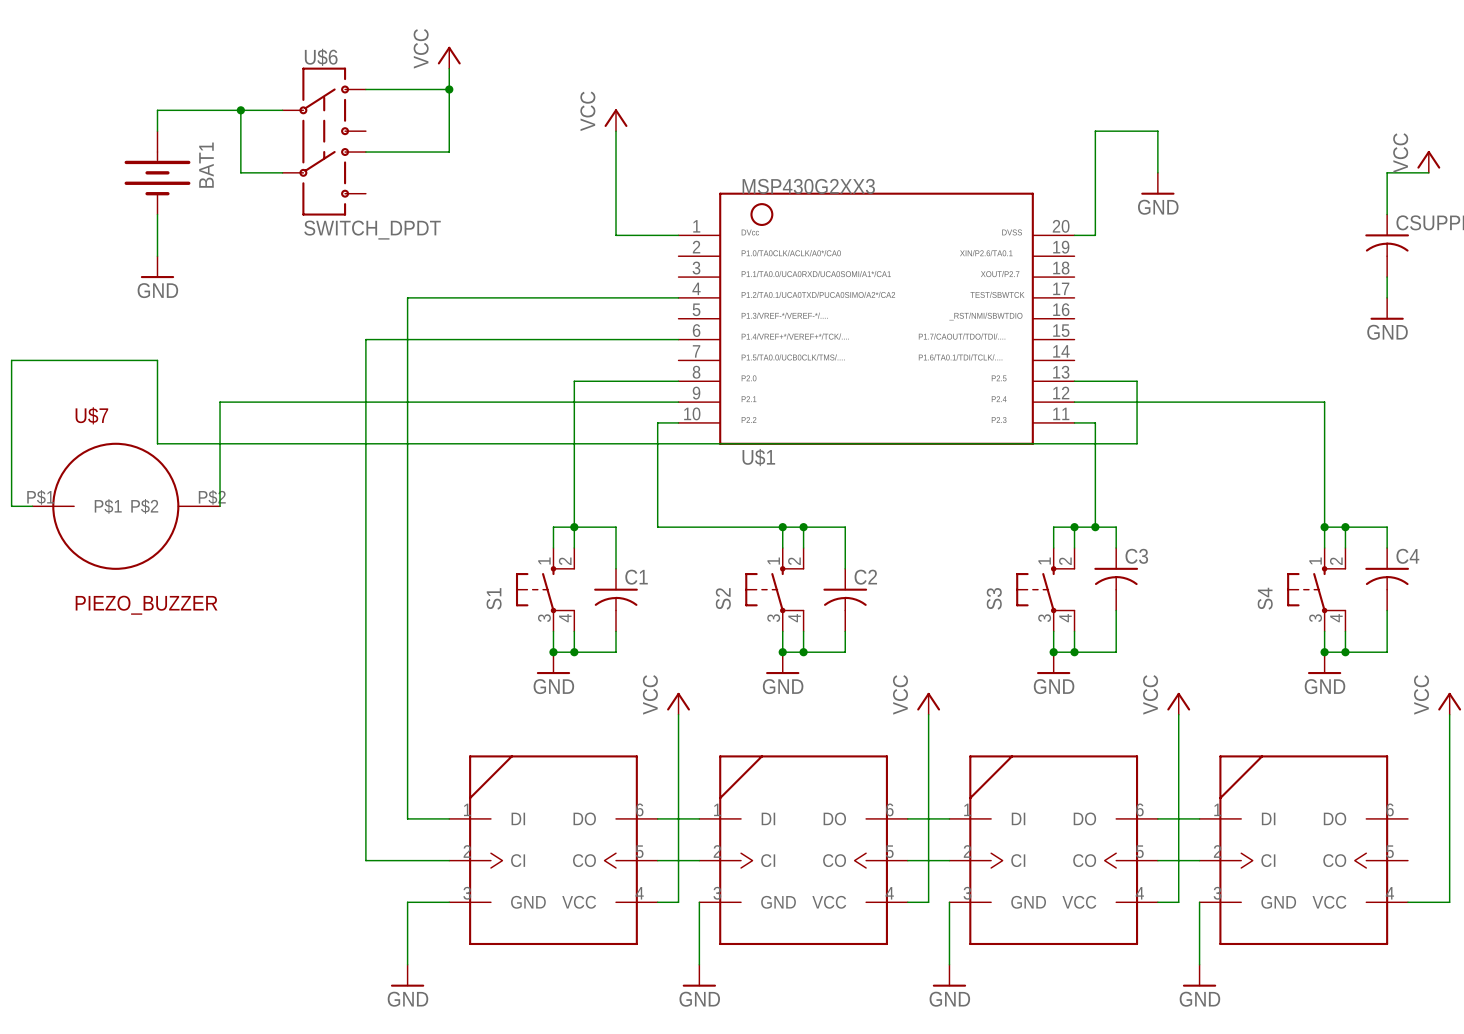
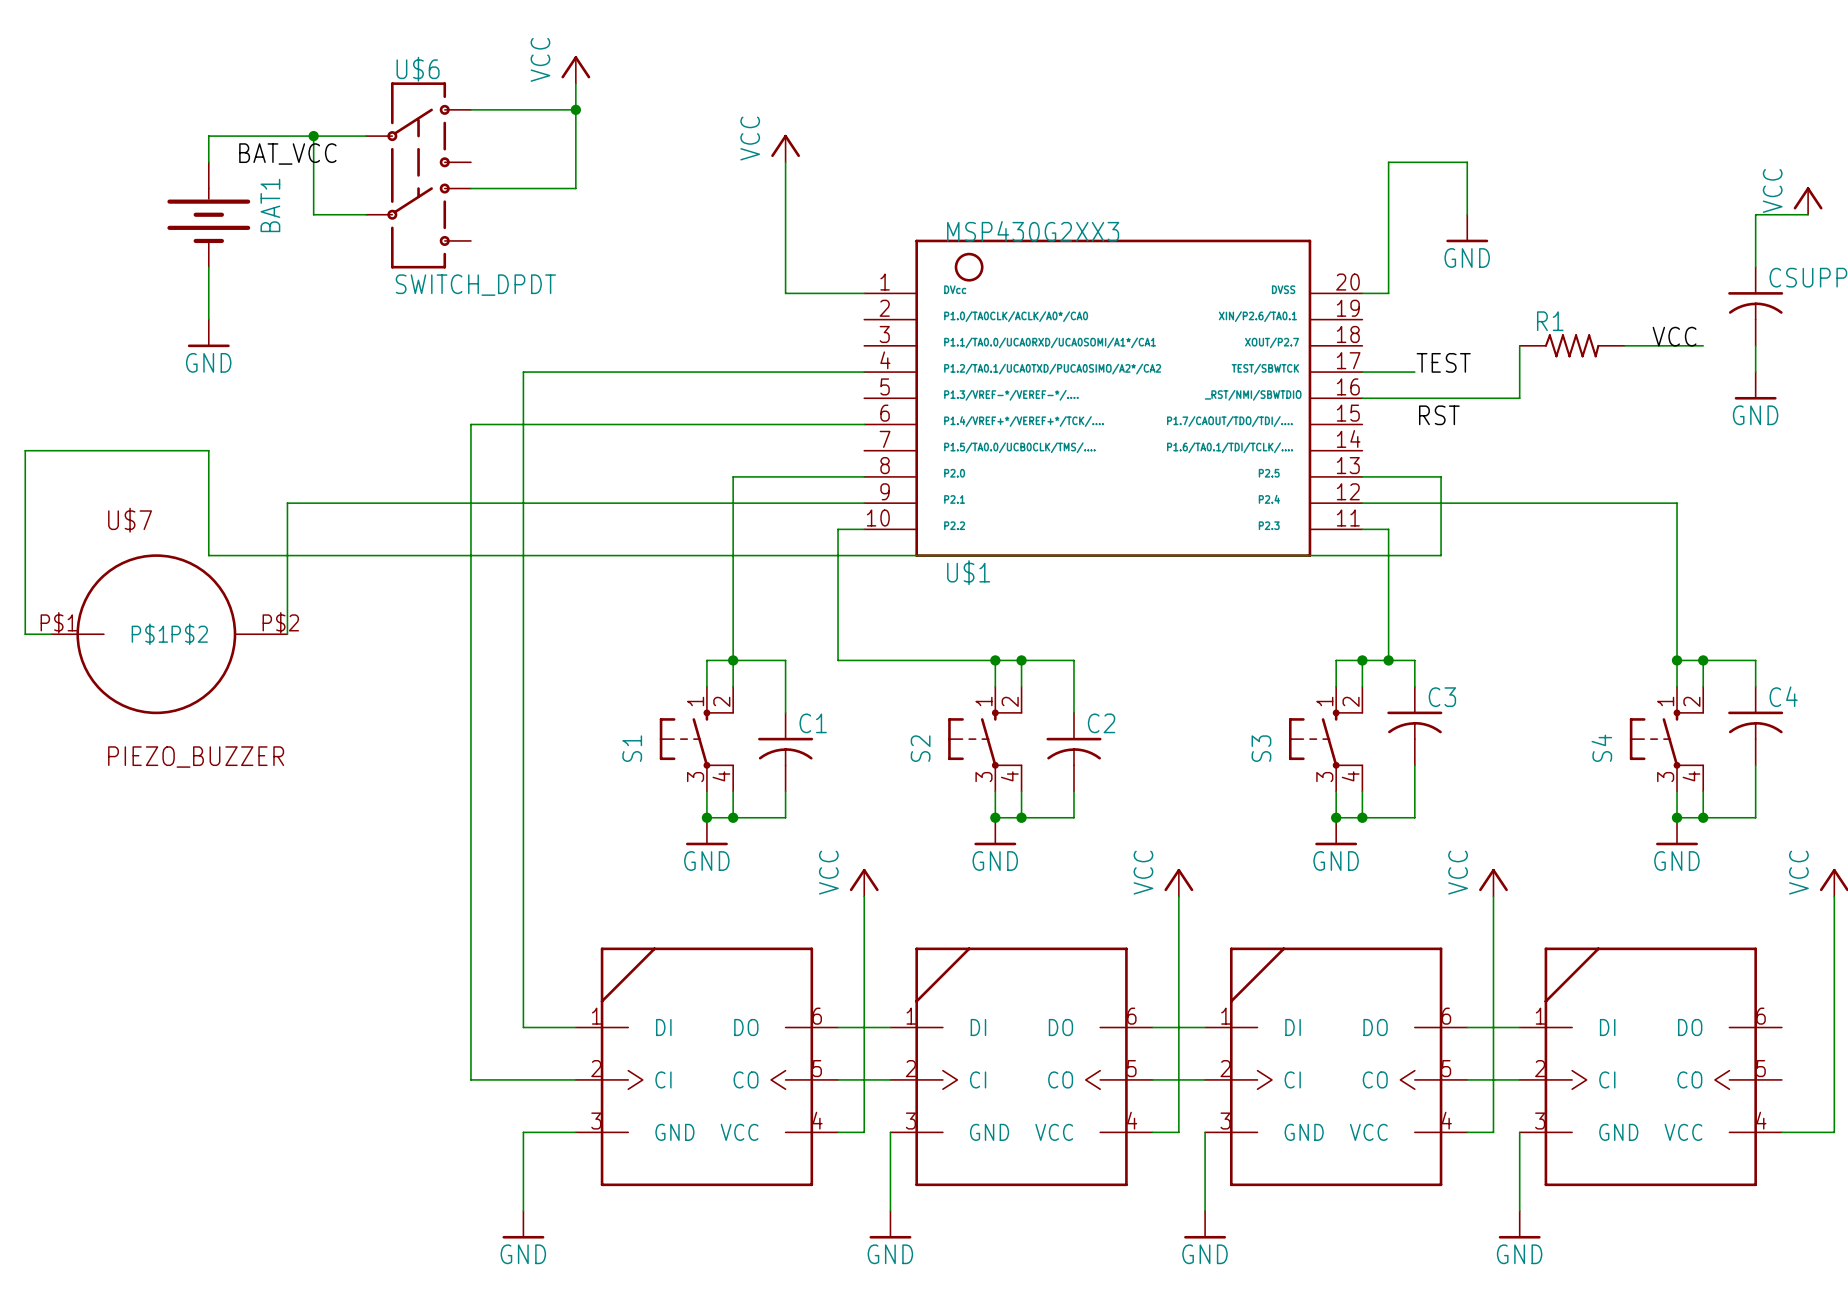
label: none -> BAT_VCC (287, 154)
label: none -> VCC (1674, 336)
wire: none -> (1519, 345) (1519, 398) (1362, 398)
R1: none -> (1572, 345)
wire: none -> (1624, 345) (1703, 345)
label: none -> TEST (1443, 362)
wire: none -> (1362, 372) (1414, 372)
label: none -> RST (1439, 415)

